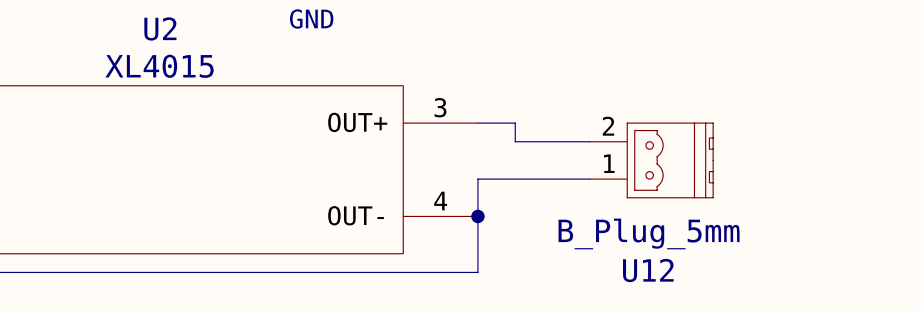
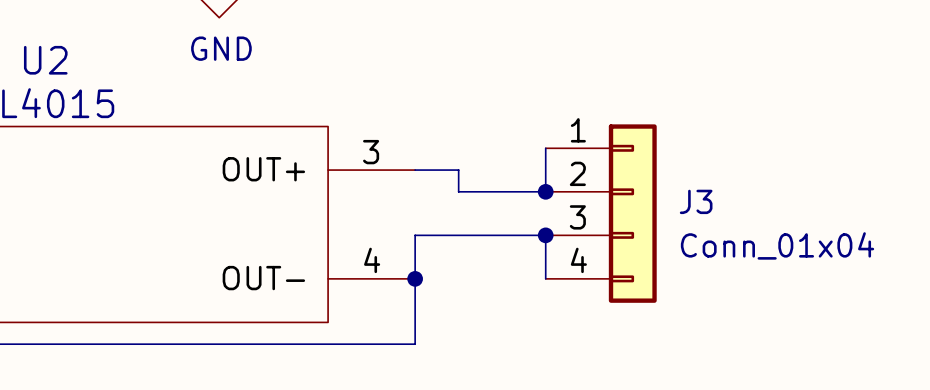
wire: none -> (545, 148) (545, 191)
junction: none -> (545, 191)
J3: none -> Conn_01x04 (601, 213)
U12: B_Plug_5mm (651, 160) -> none
wire: none -> (545, 235) (545, 278)
junction: none -> (545, 235)

